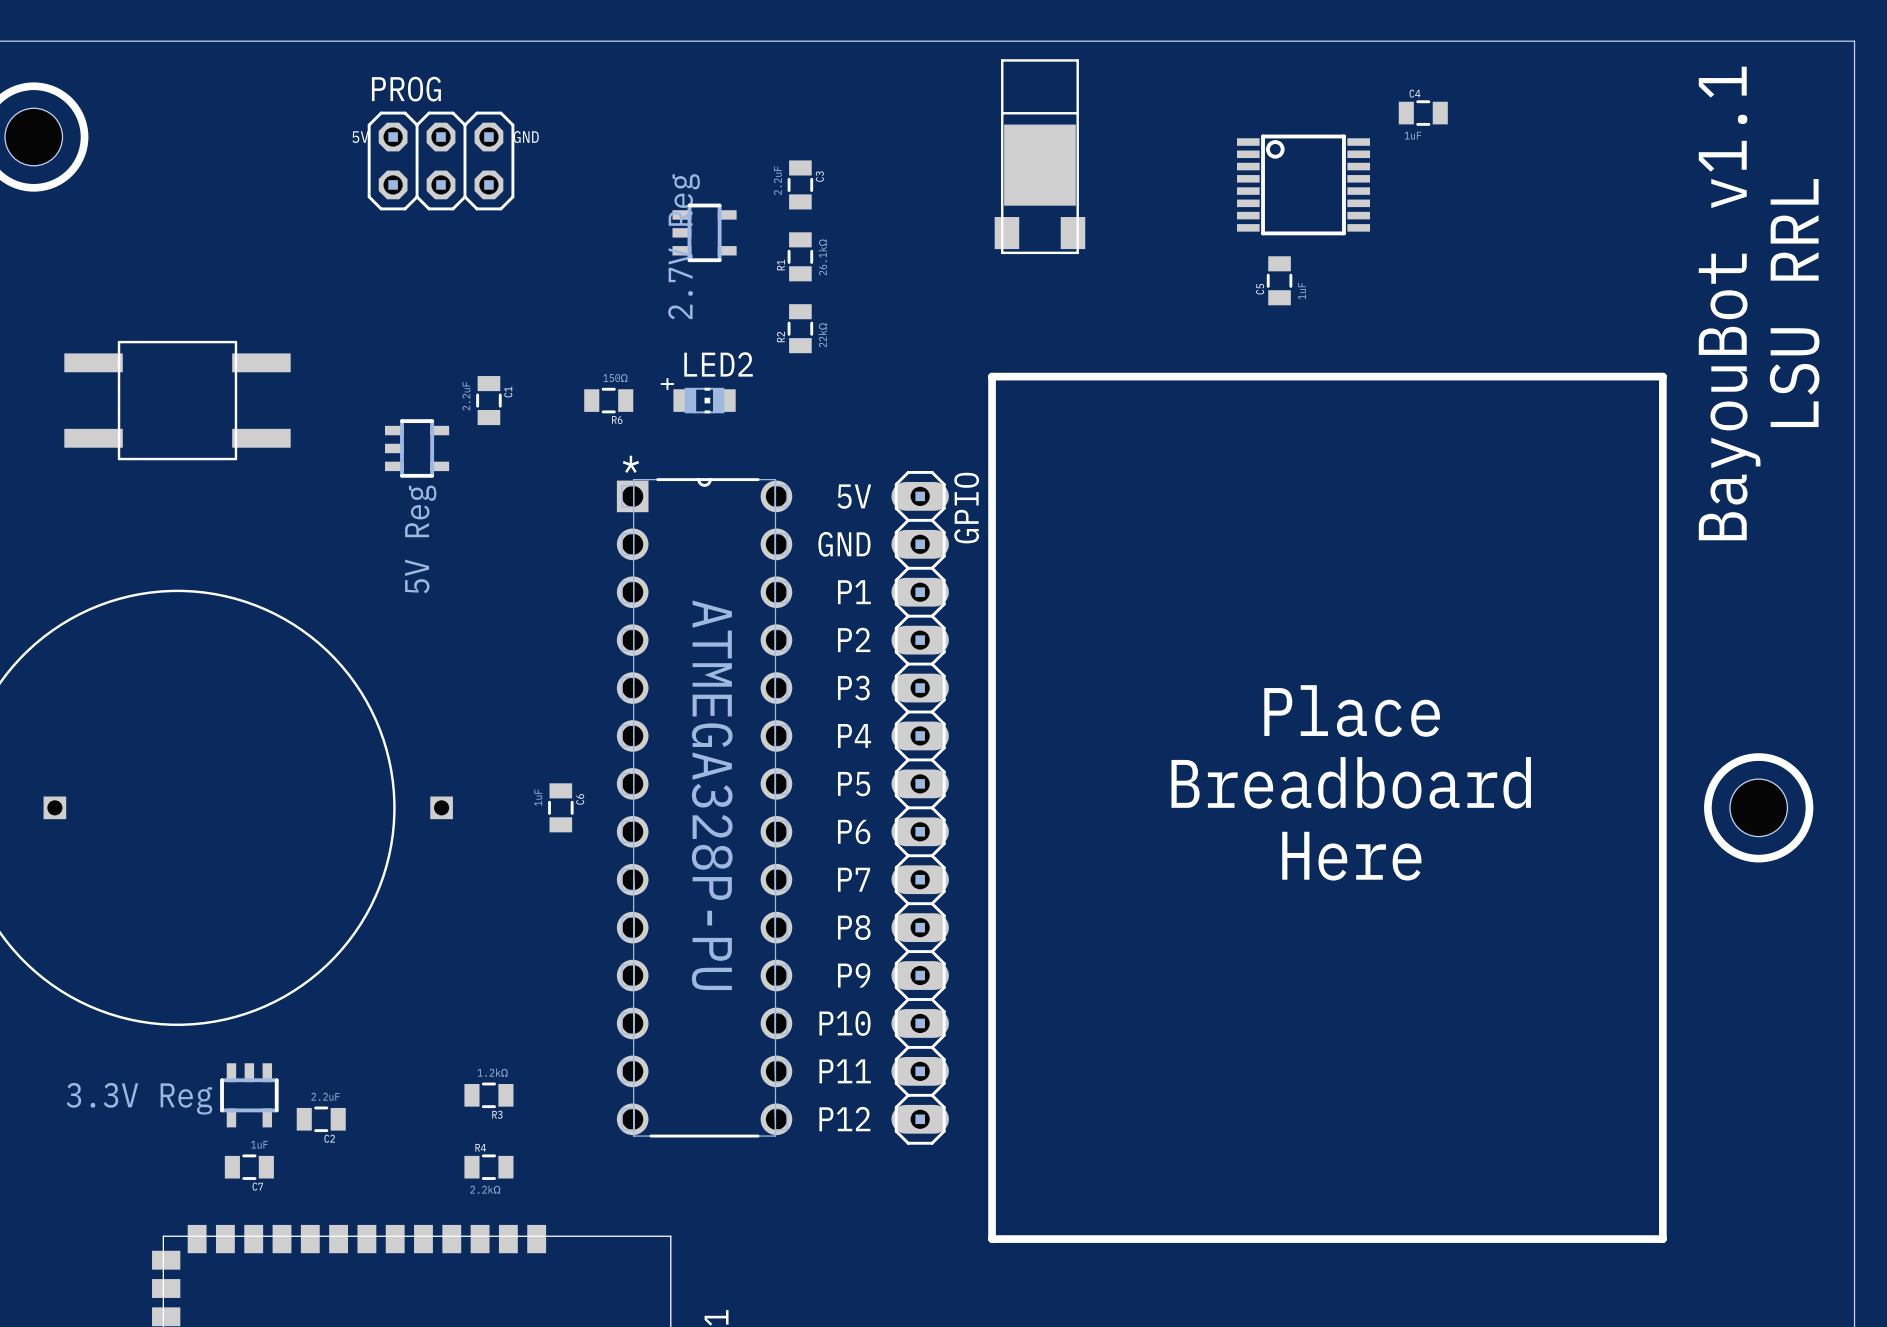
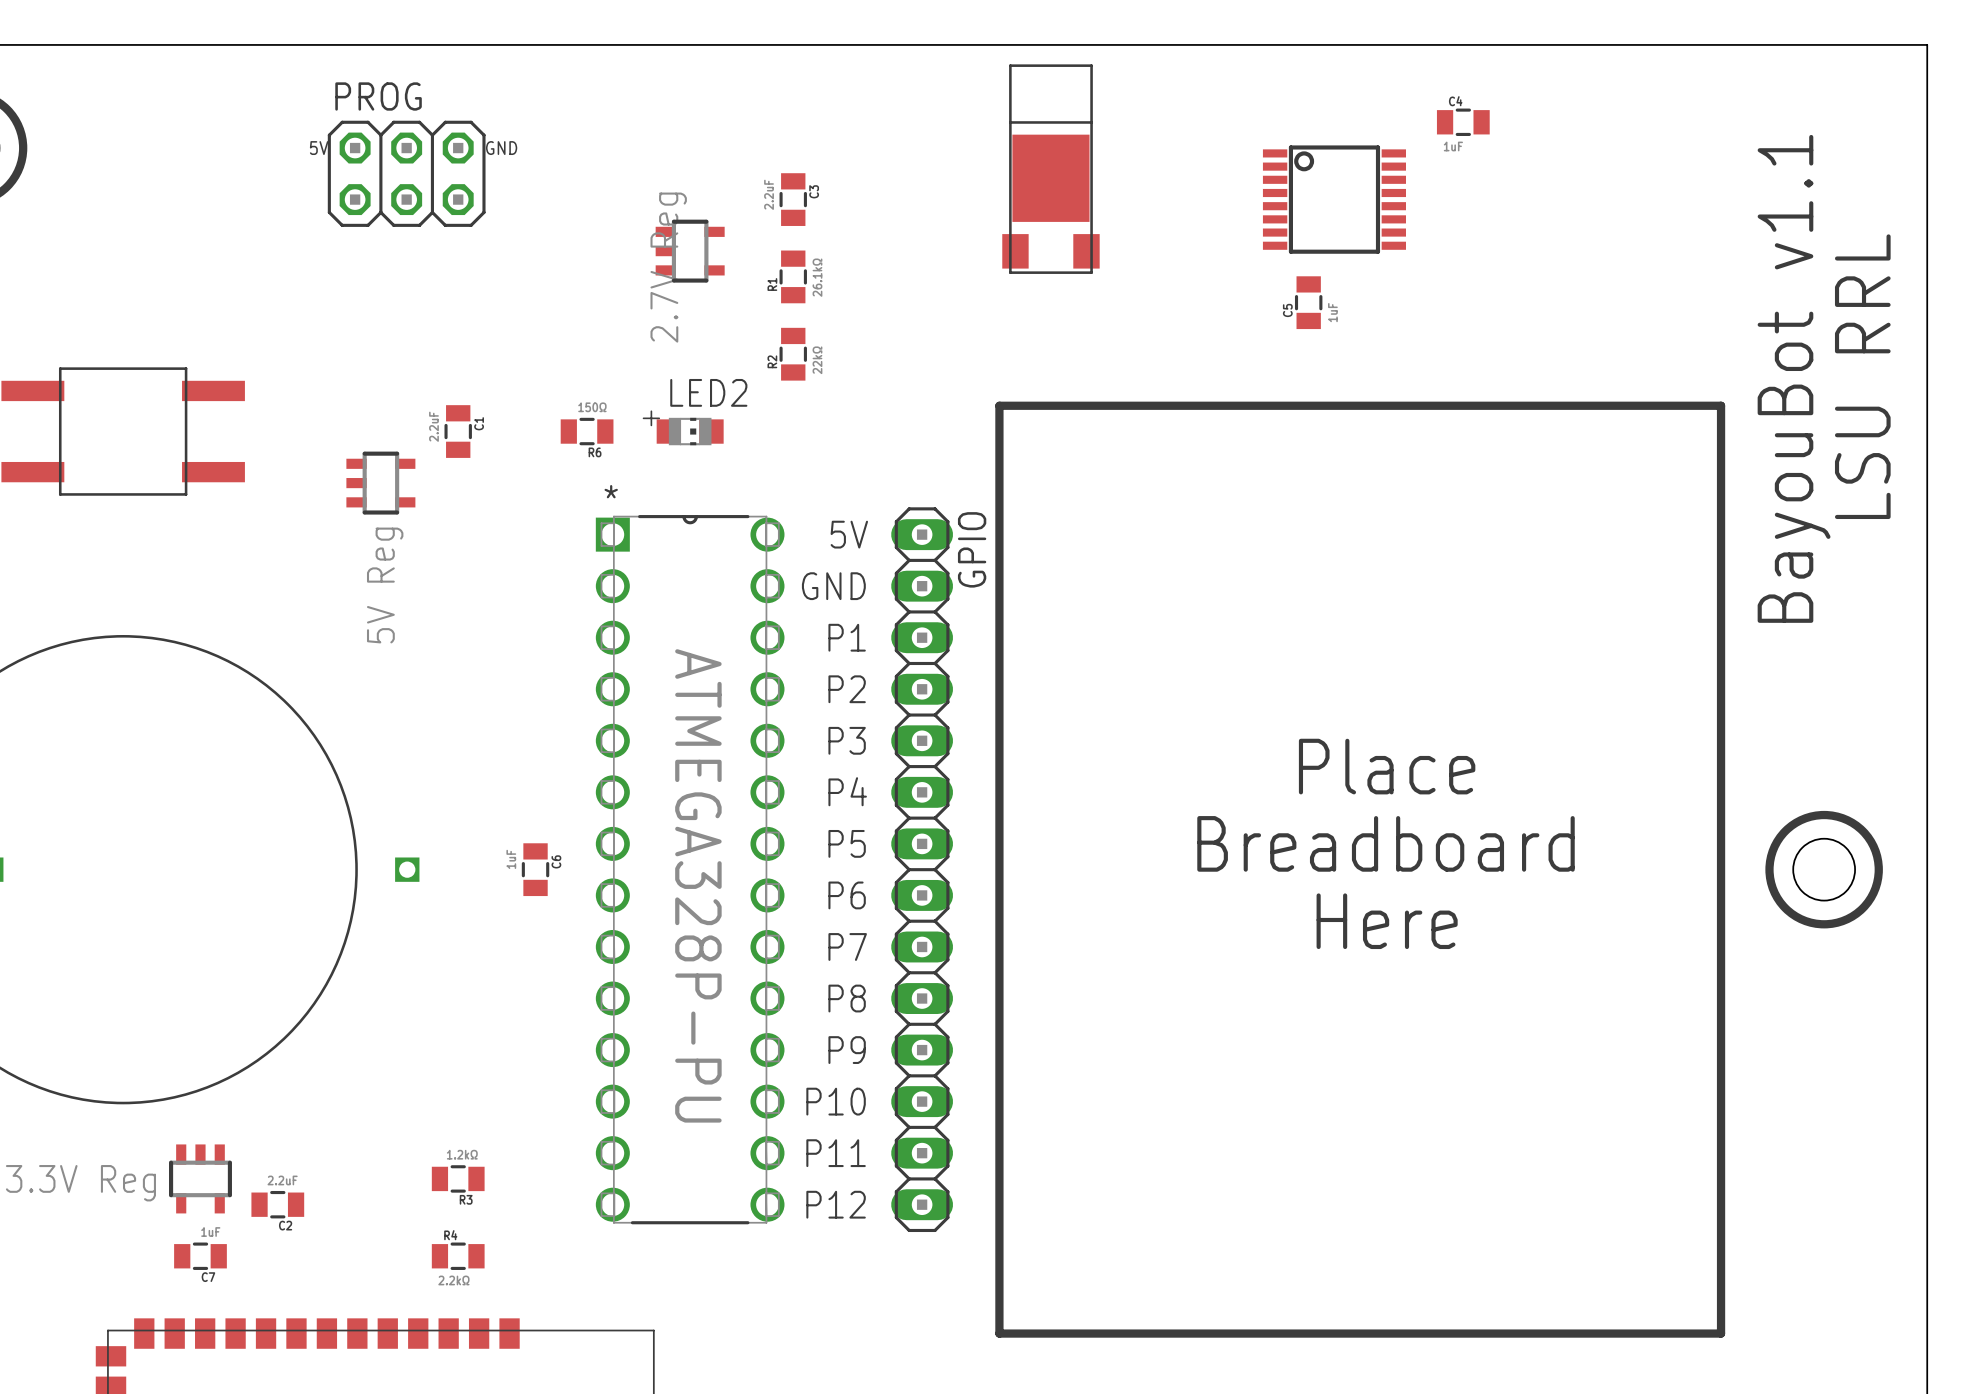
text position: BayouBot v1.1 (1729, 303) -> BayouBot v1.1 (1794, 378)
text position: LSU RRL (1794, 303) -> LSU RRL (1862, 376)

